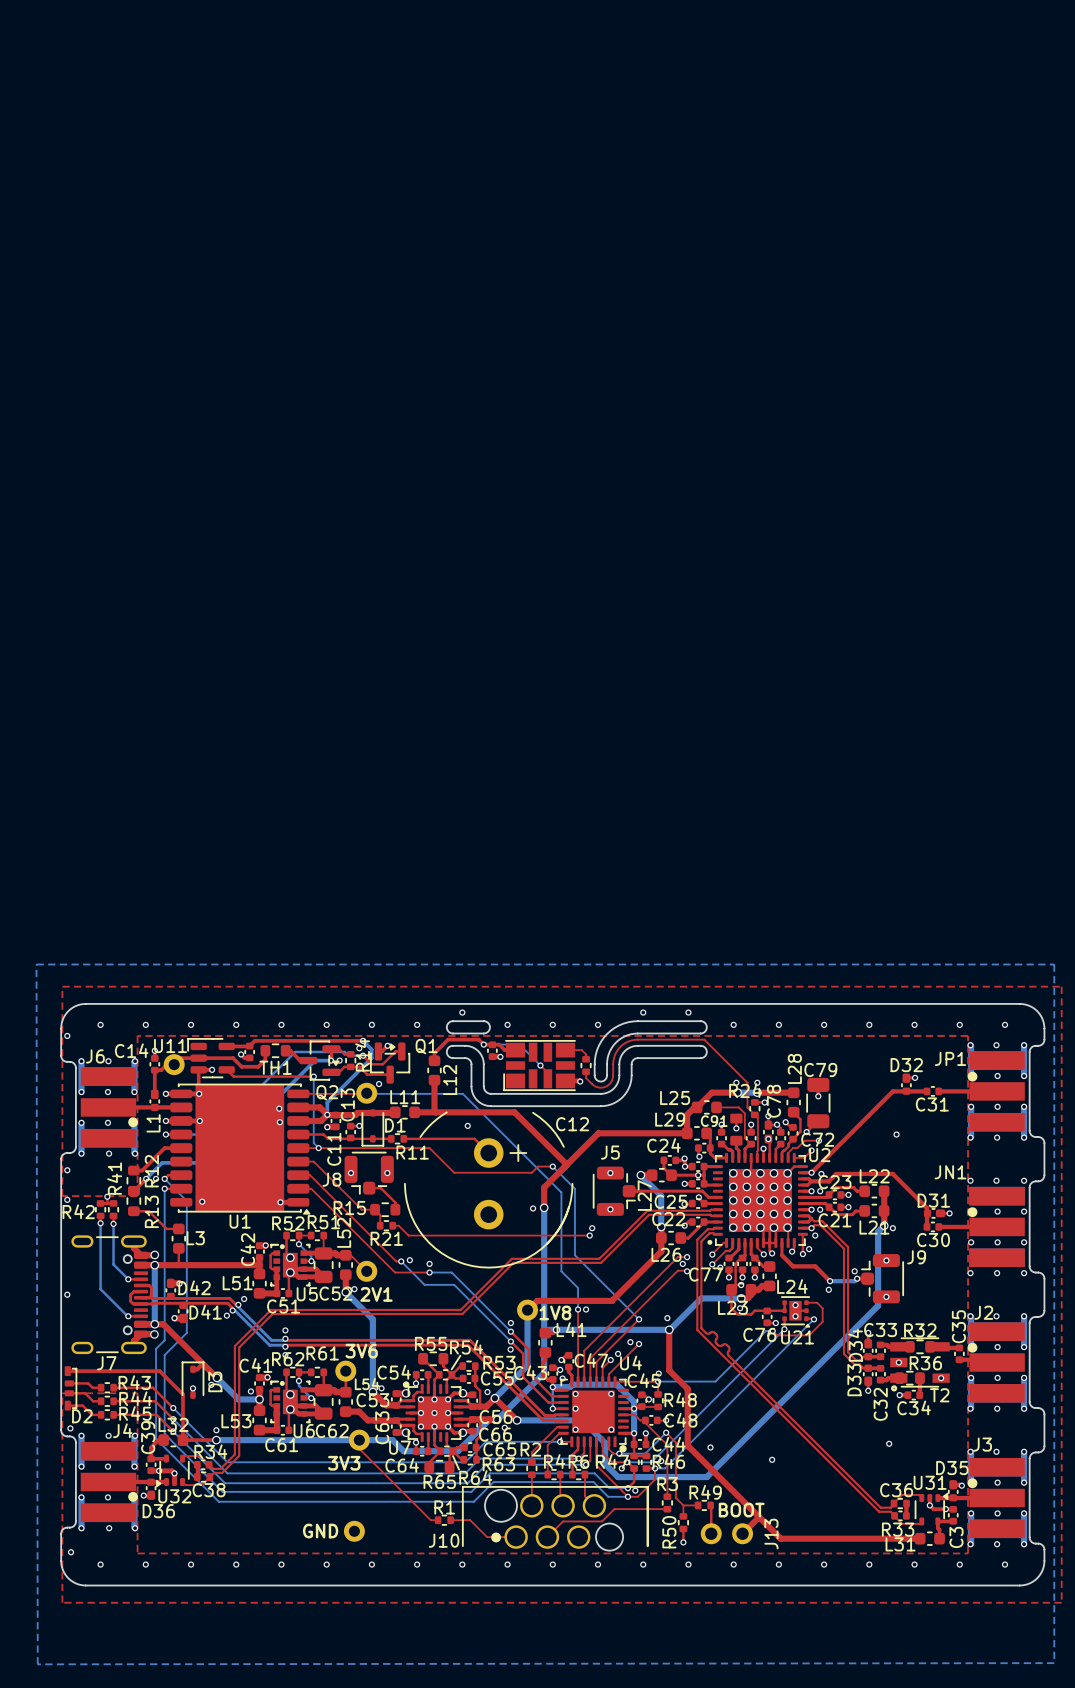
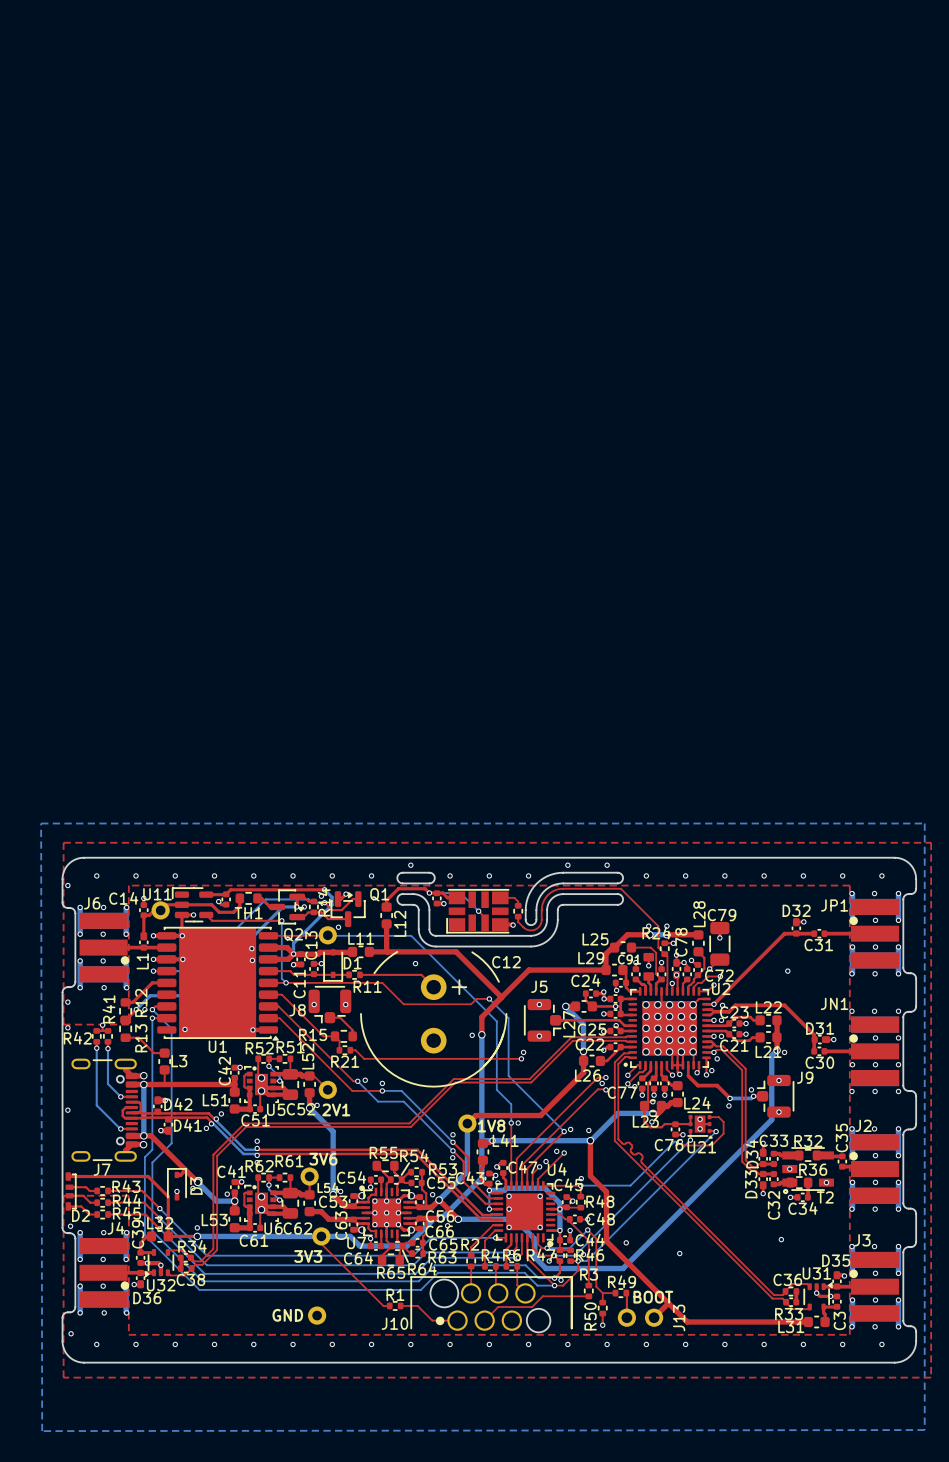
via: none -> (570, 1129)

